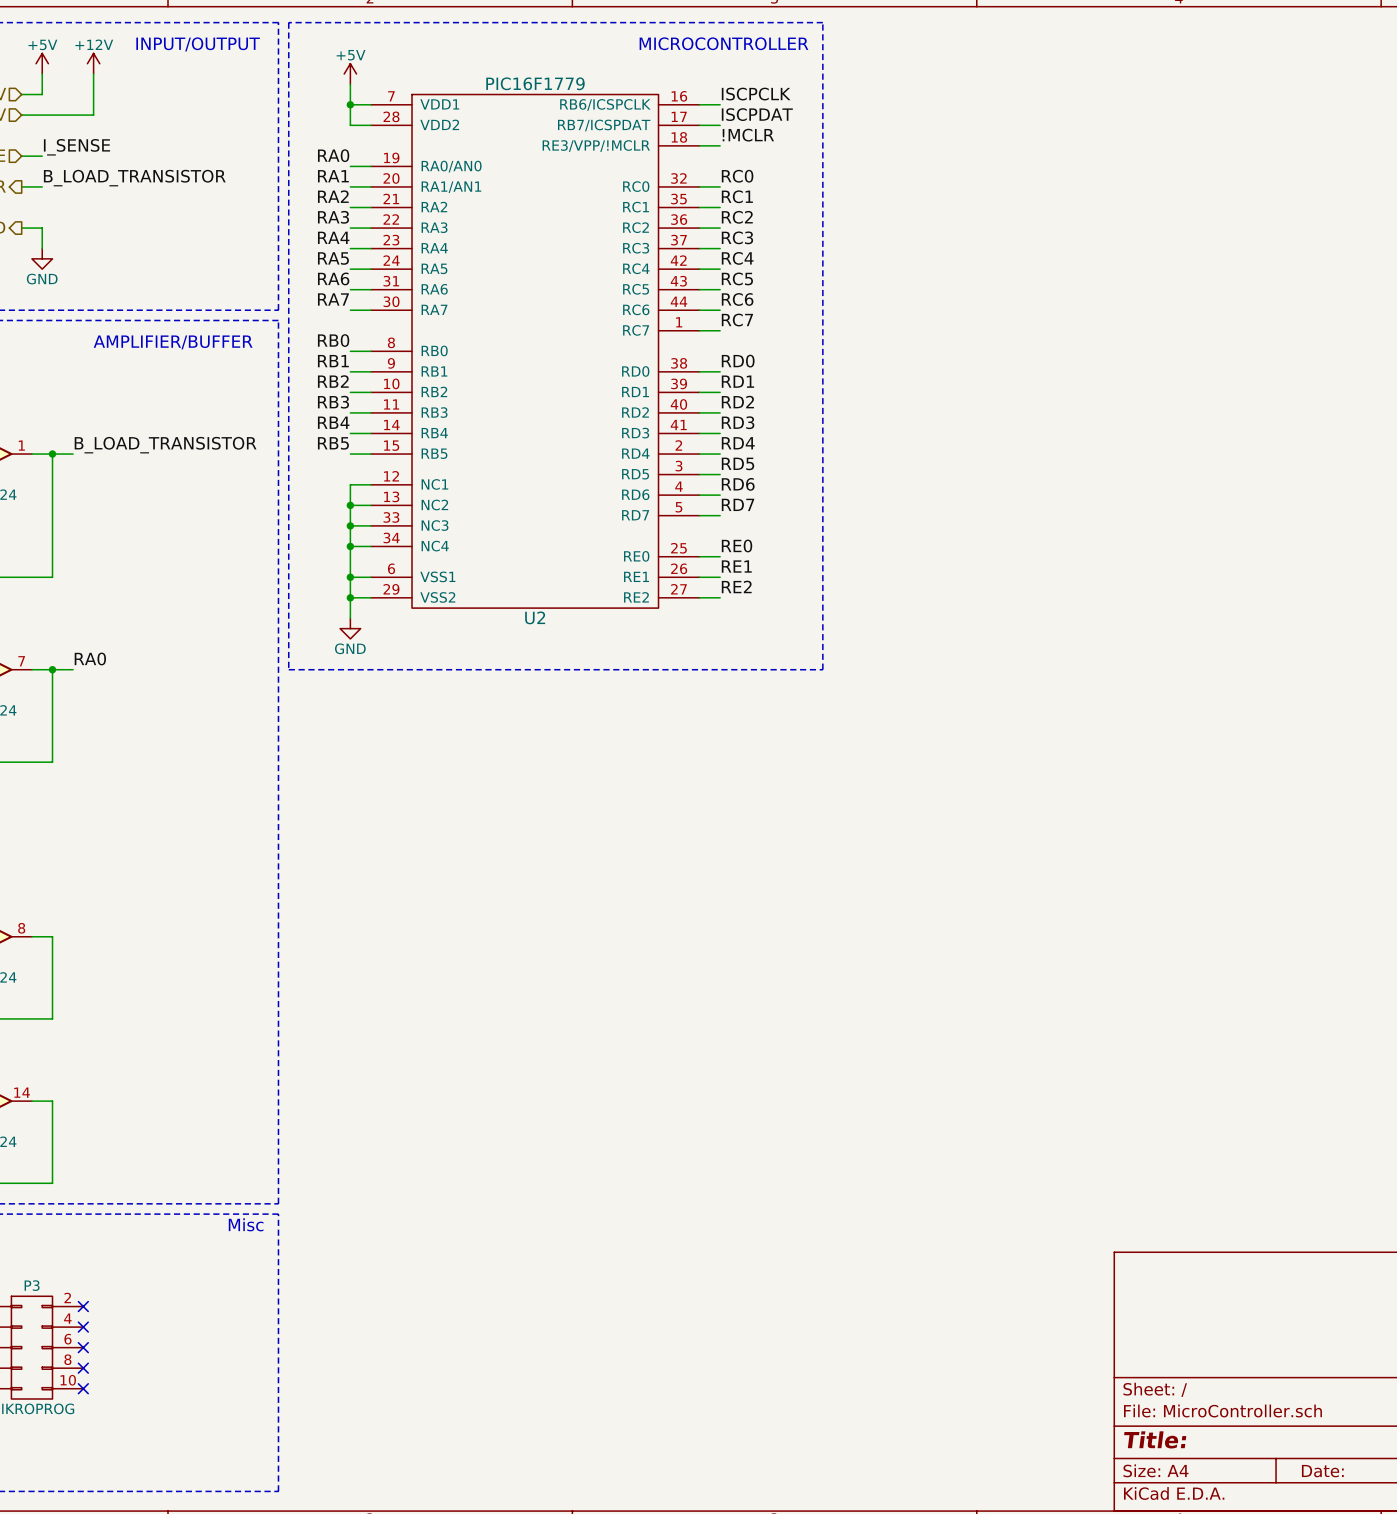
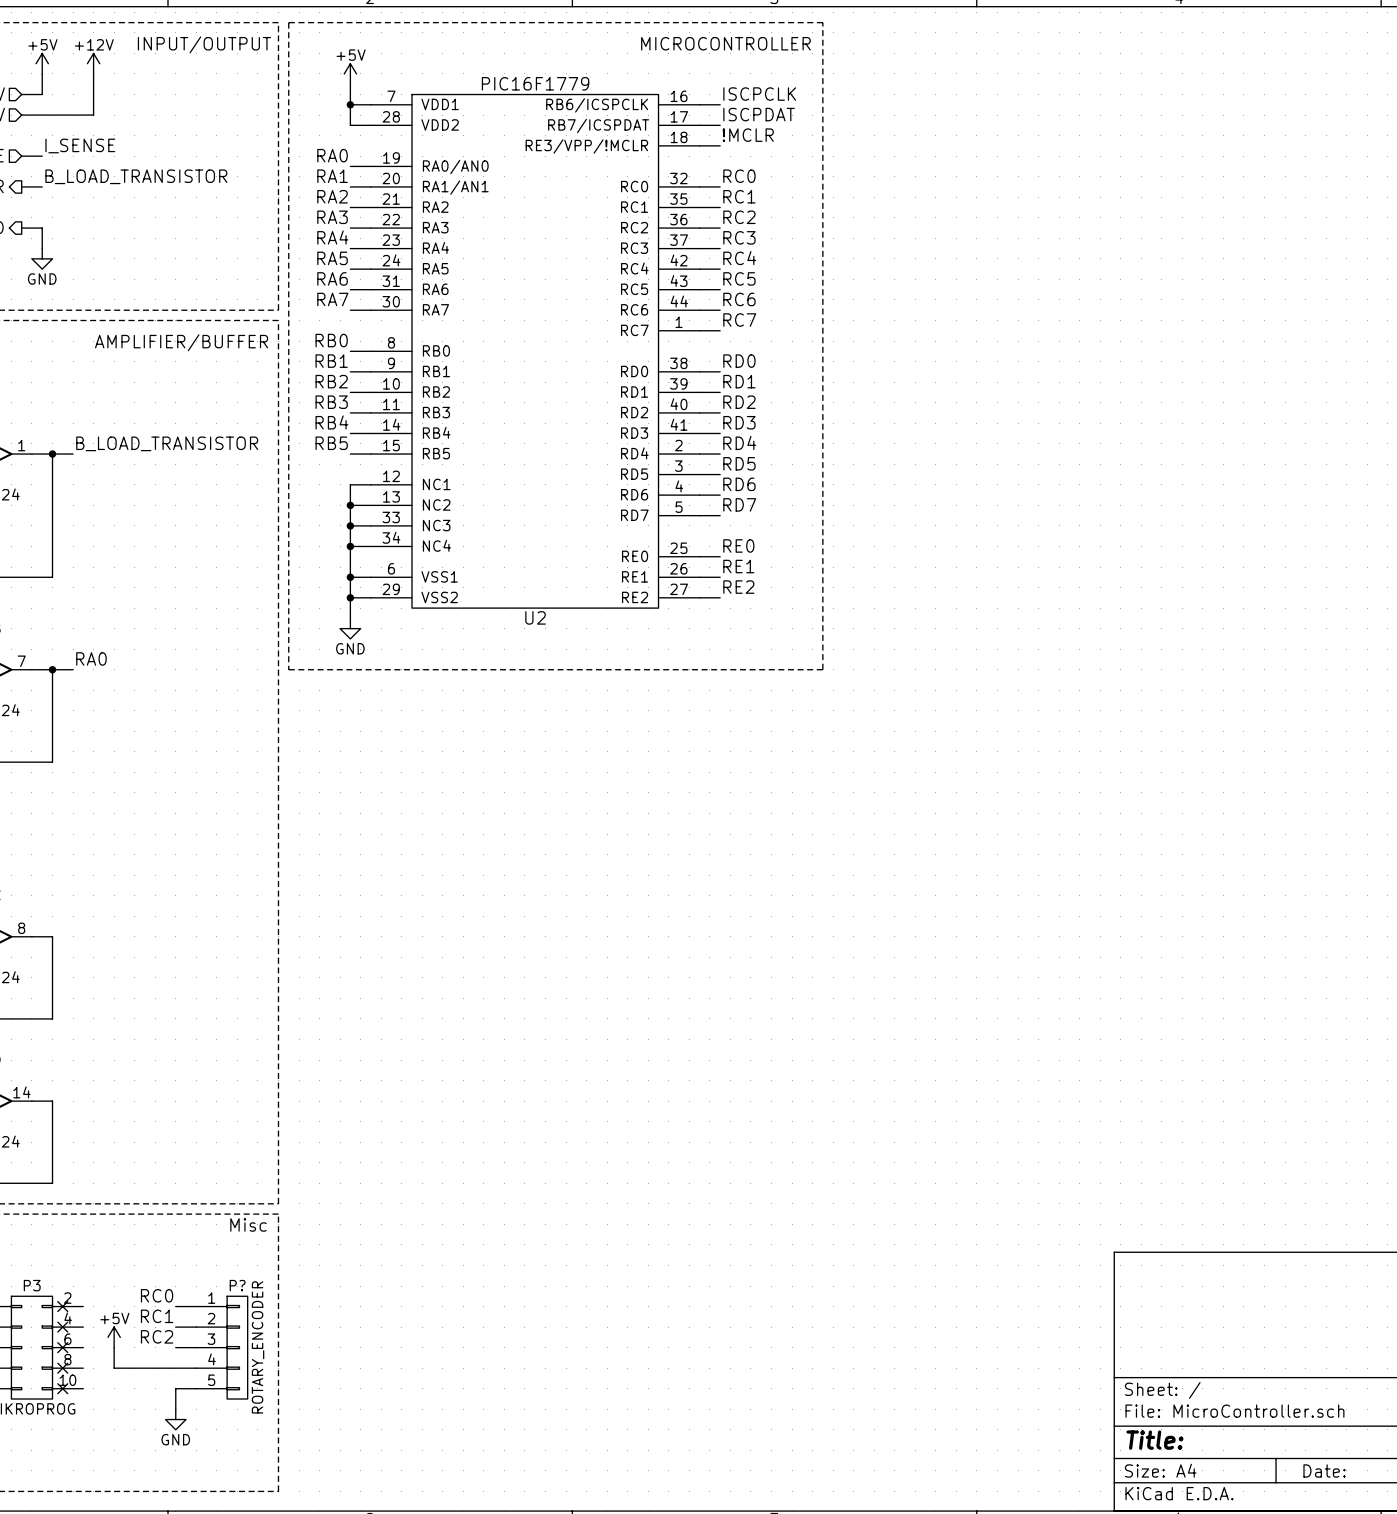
label: none -> RC0 (157, 1295)
no-connect mark: none -> (62, 1306)
no-connect mark: (83, 1306) -> none
wire: none -> (175, 1306) (196, 1306)
label: none -> RC1 (157, 1316)
no-connect mark: none -> (62, 1327)
no-connect mark: (83, 1327) -> none
wire: none -> (175, 1327) (196, 1327)
label: none -> RC2 (157, 1336)
power symbol: none -> +5V (114, 1337)
no-connect mark: none -> (62, 1347)
no-connect mark: (83, 1347) -> none
wire: none -> (114, 1347) (114, 1368) (196, 1368)
wire: none -> (175, 1347) (196, 1347)
P?: none -> ROTARY_ENCODER (221, 1347)
no-connect mark: none -> (62, 1368)
no-connect mark: (83, 1368) -> none
no-connect mark: none -> (62, 1388)
no-connect mark: (83, 1388) -> none
wire: none -> (196, 1388) (175, 1388) (175, 1409)
power symbol: none -> GND (175, 1419)

